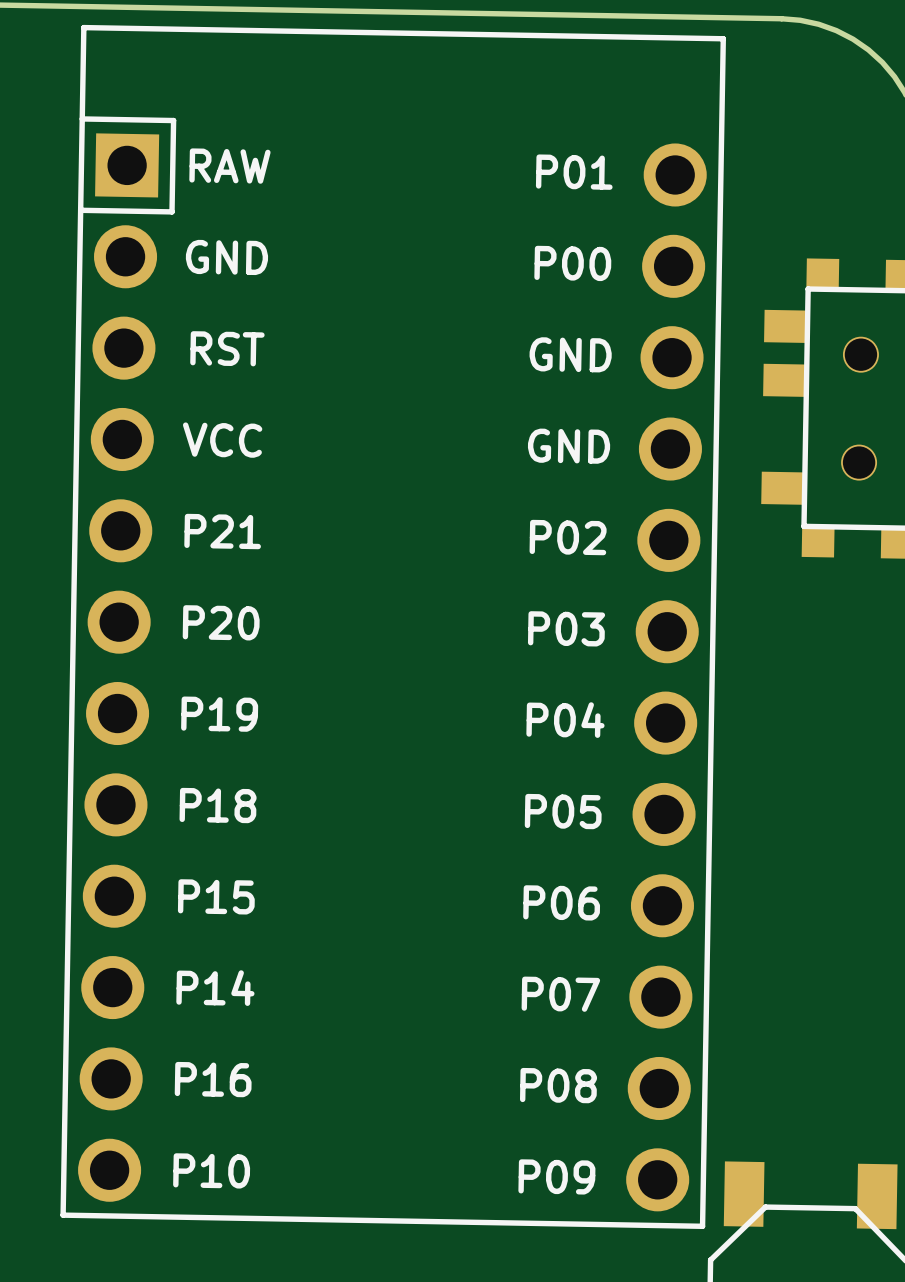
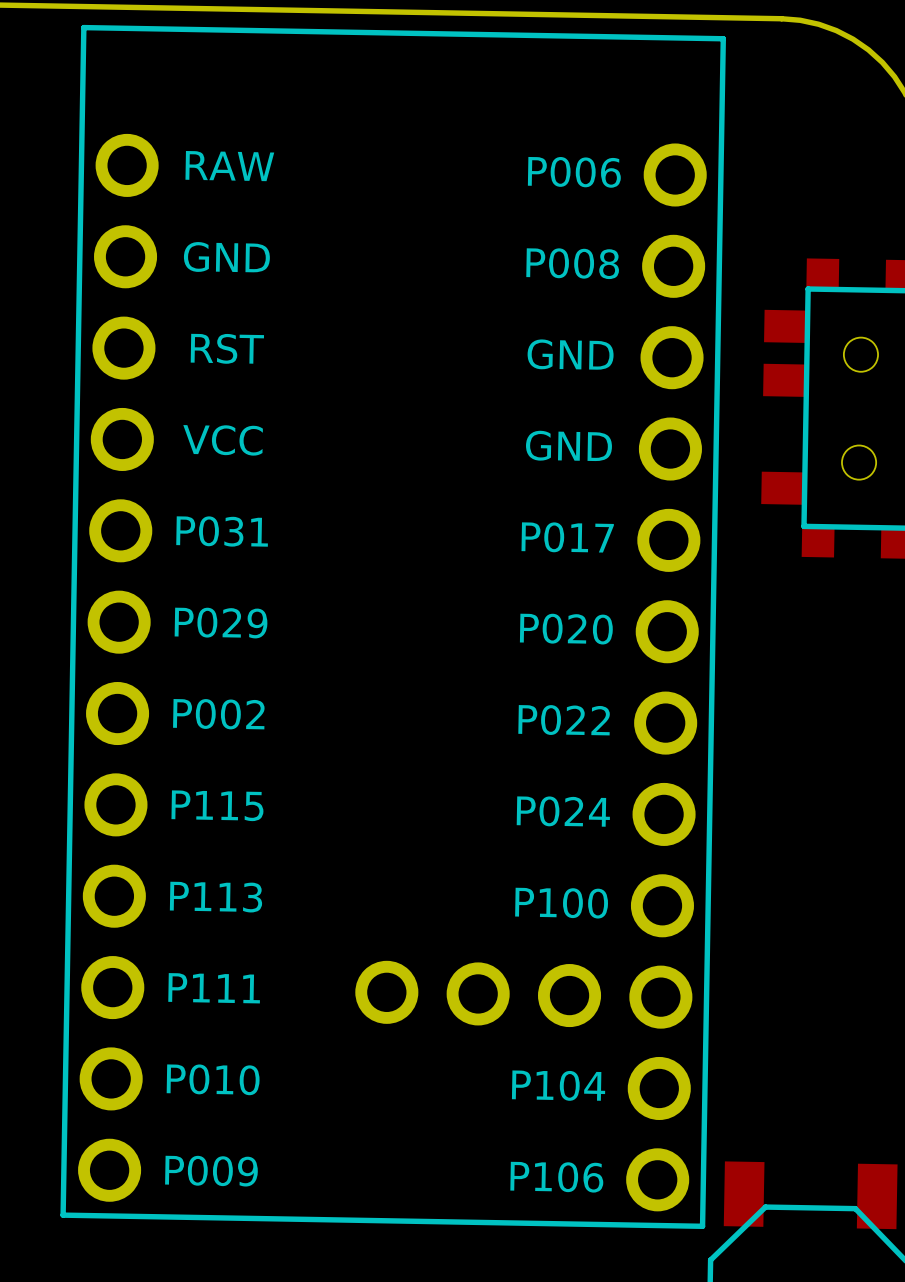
part footprint: [60, 24, 726, 1230] -> [60, 24, 726, 1230]

